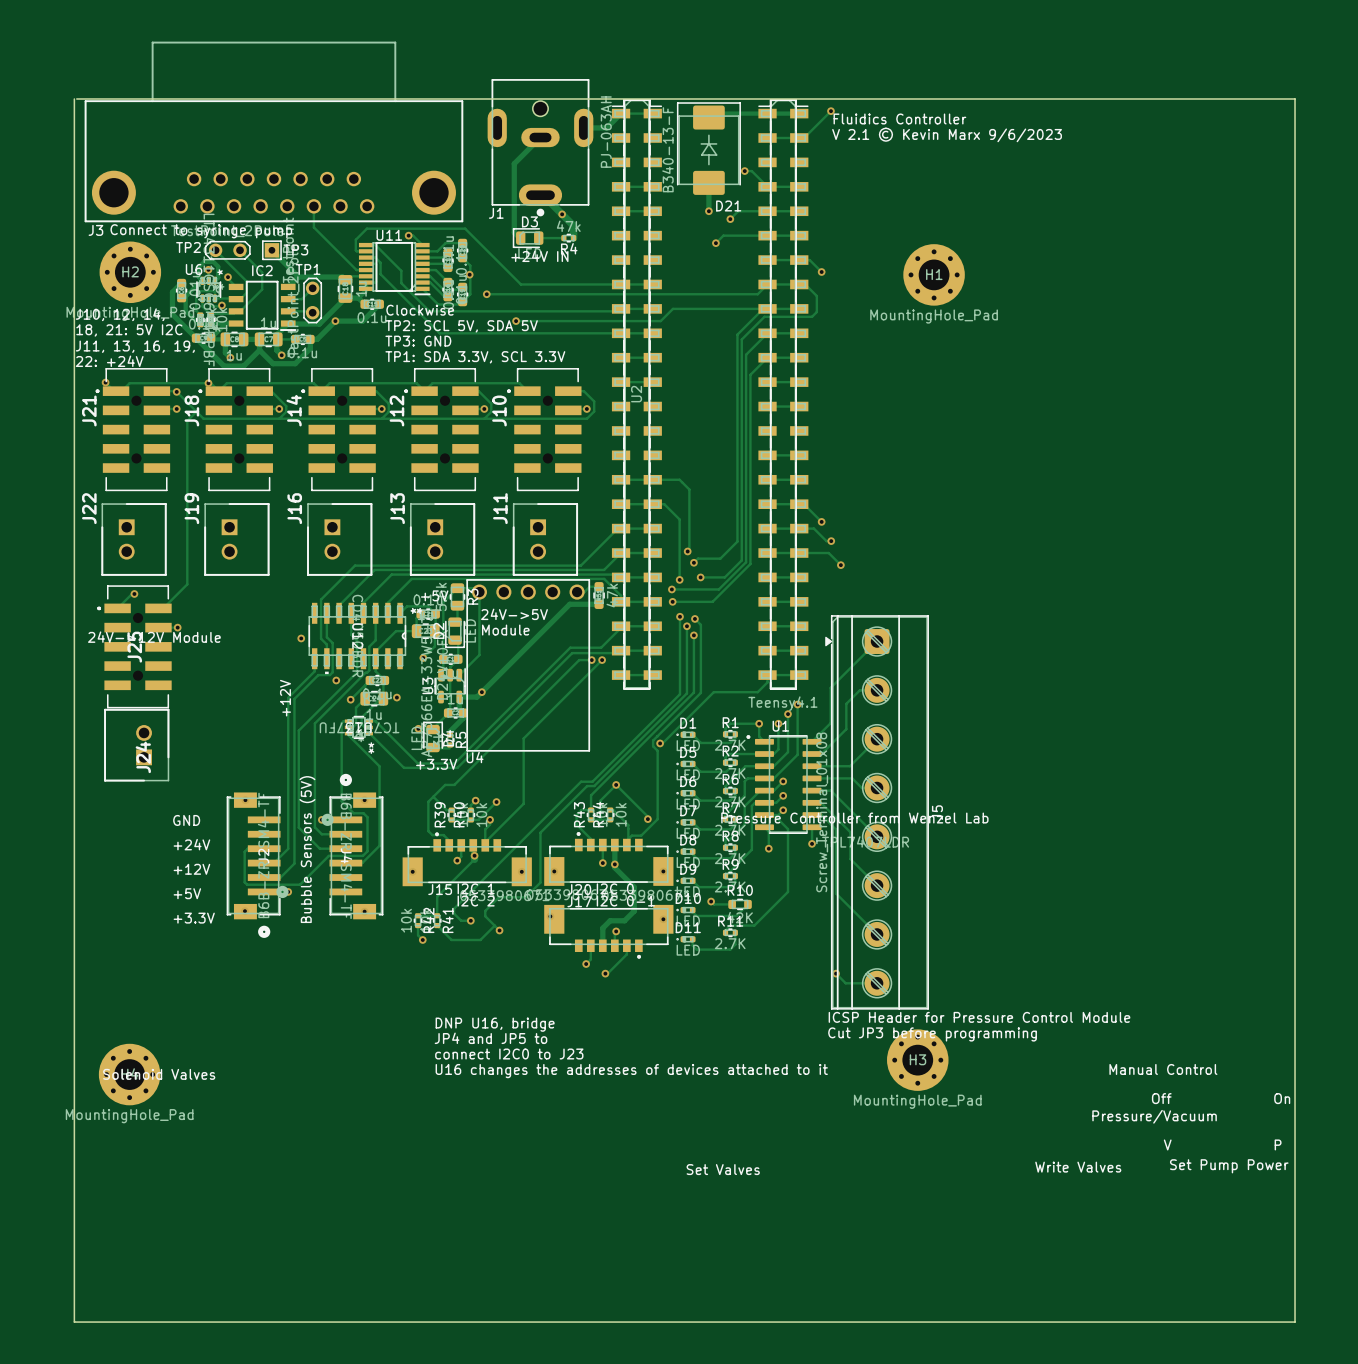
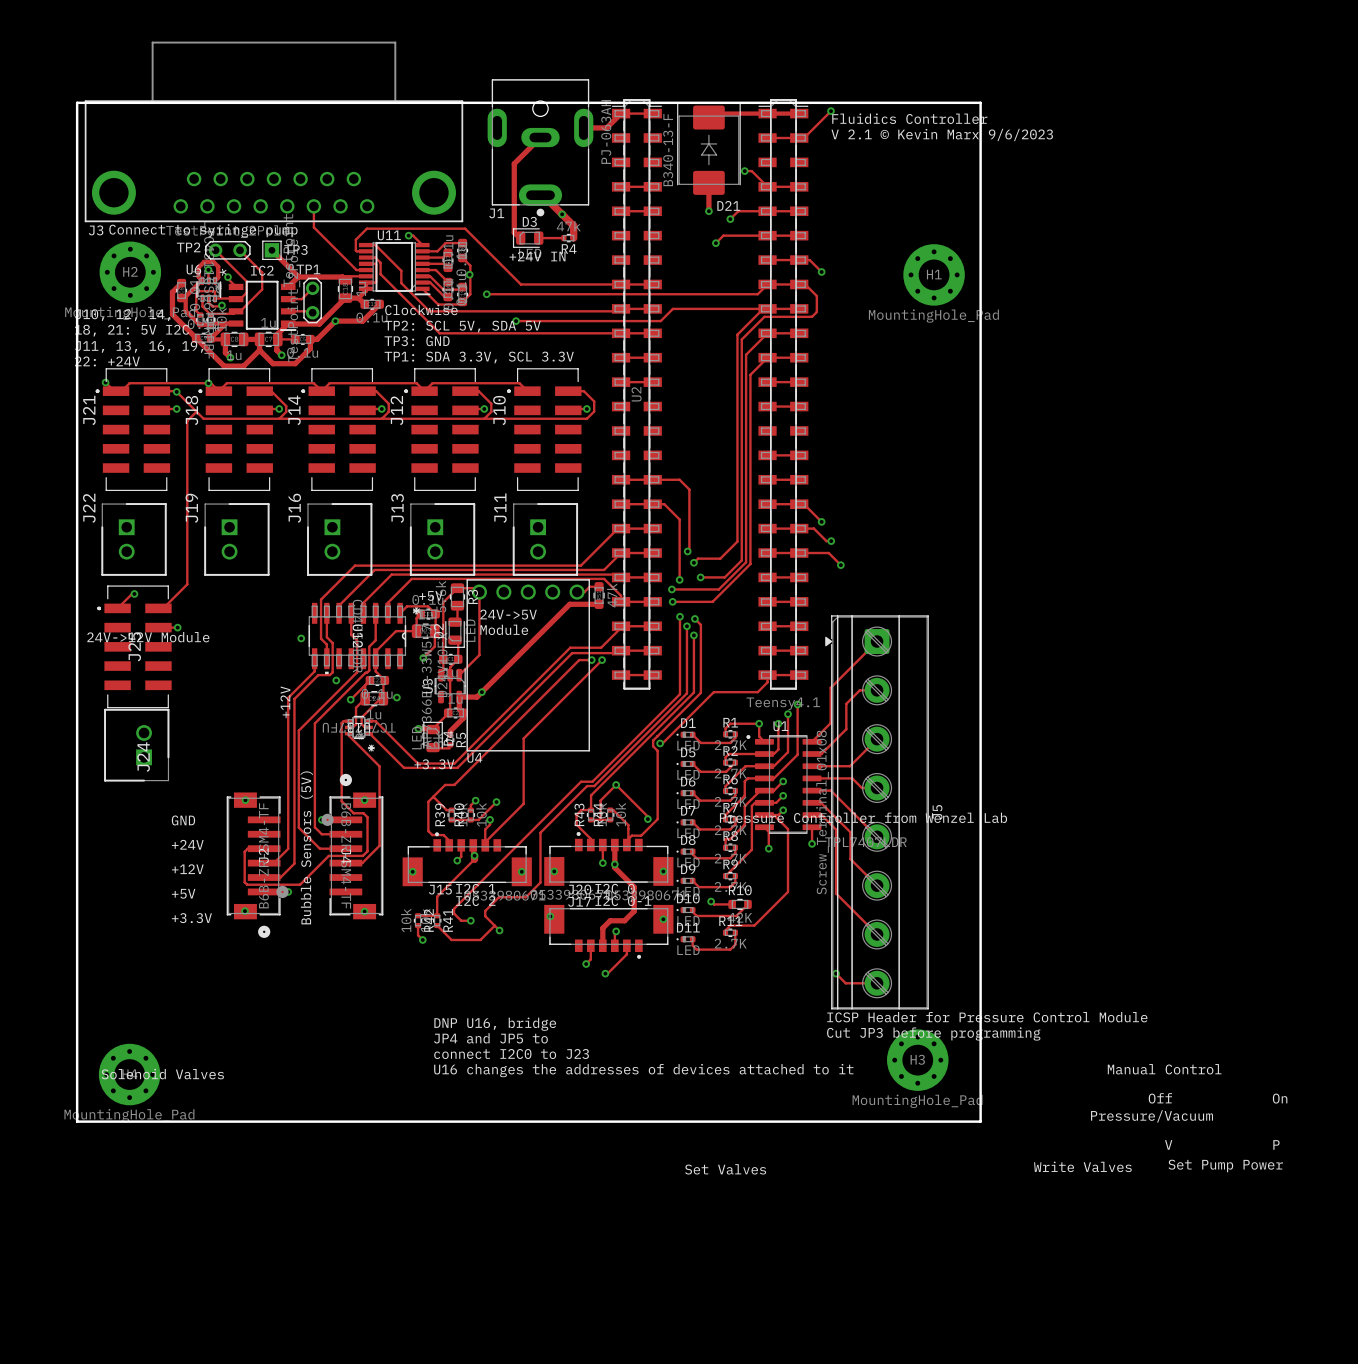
board edge: (74, 98) (74, 1322) (1295, 1322) (1295, 98) (76, 98) -> none
board edge: none -> (77, 102) (980, 102) (980, 1121) (77, 1121) (77, 102)

